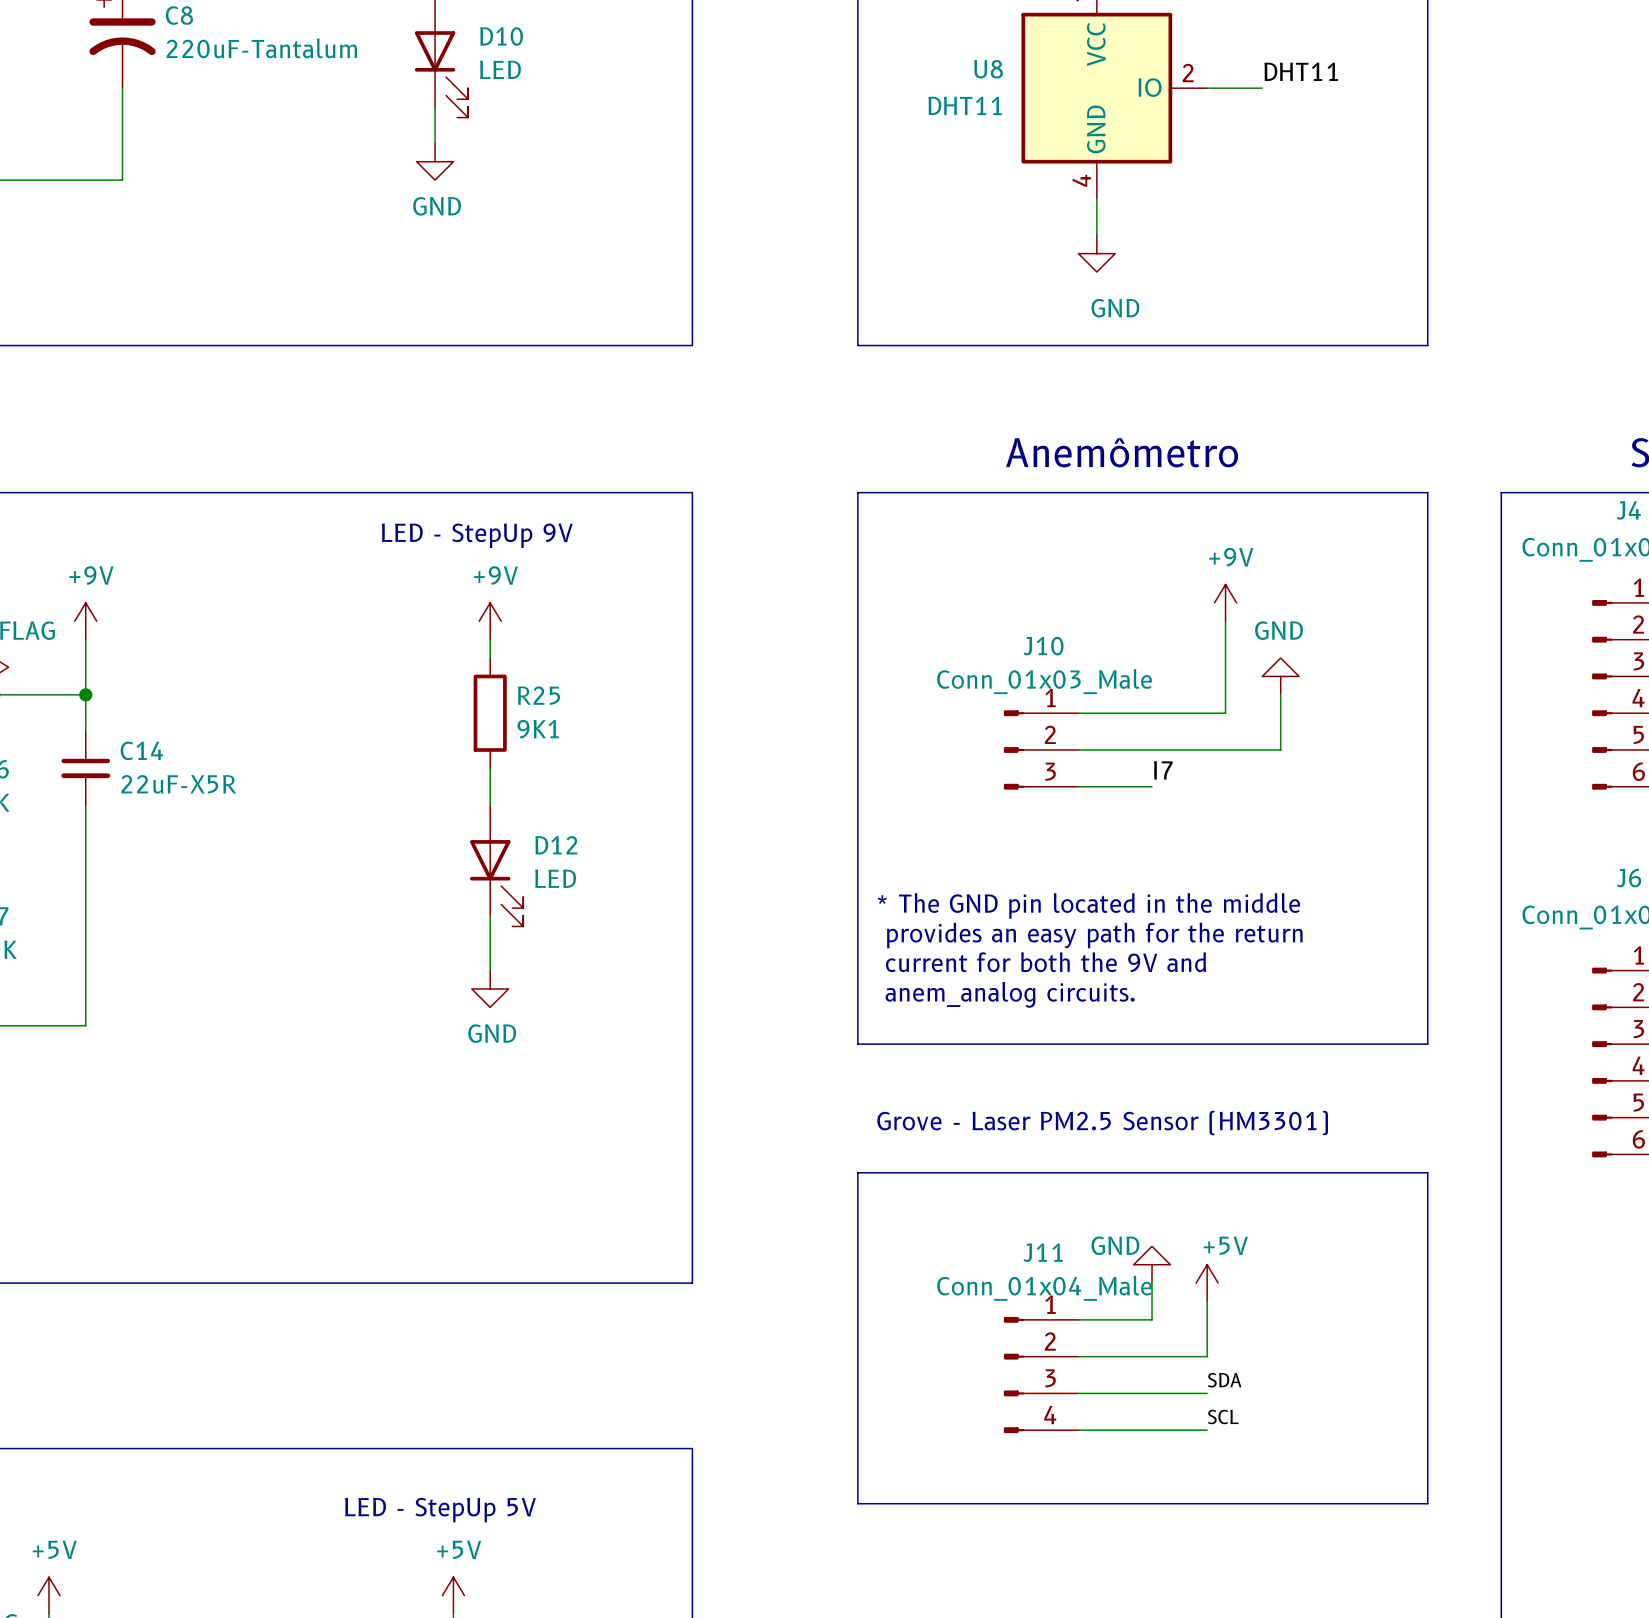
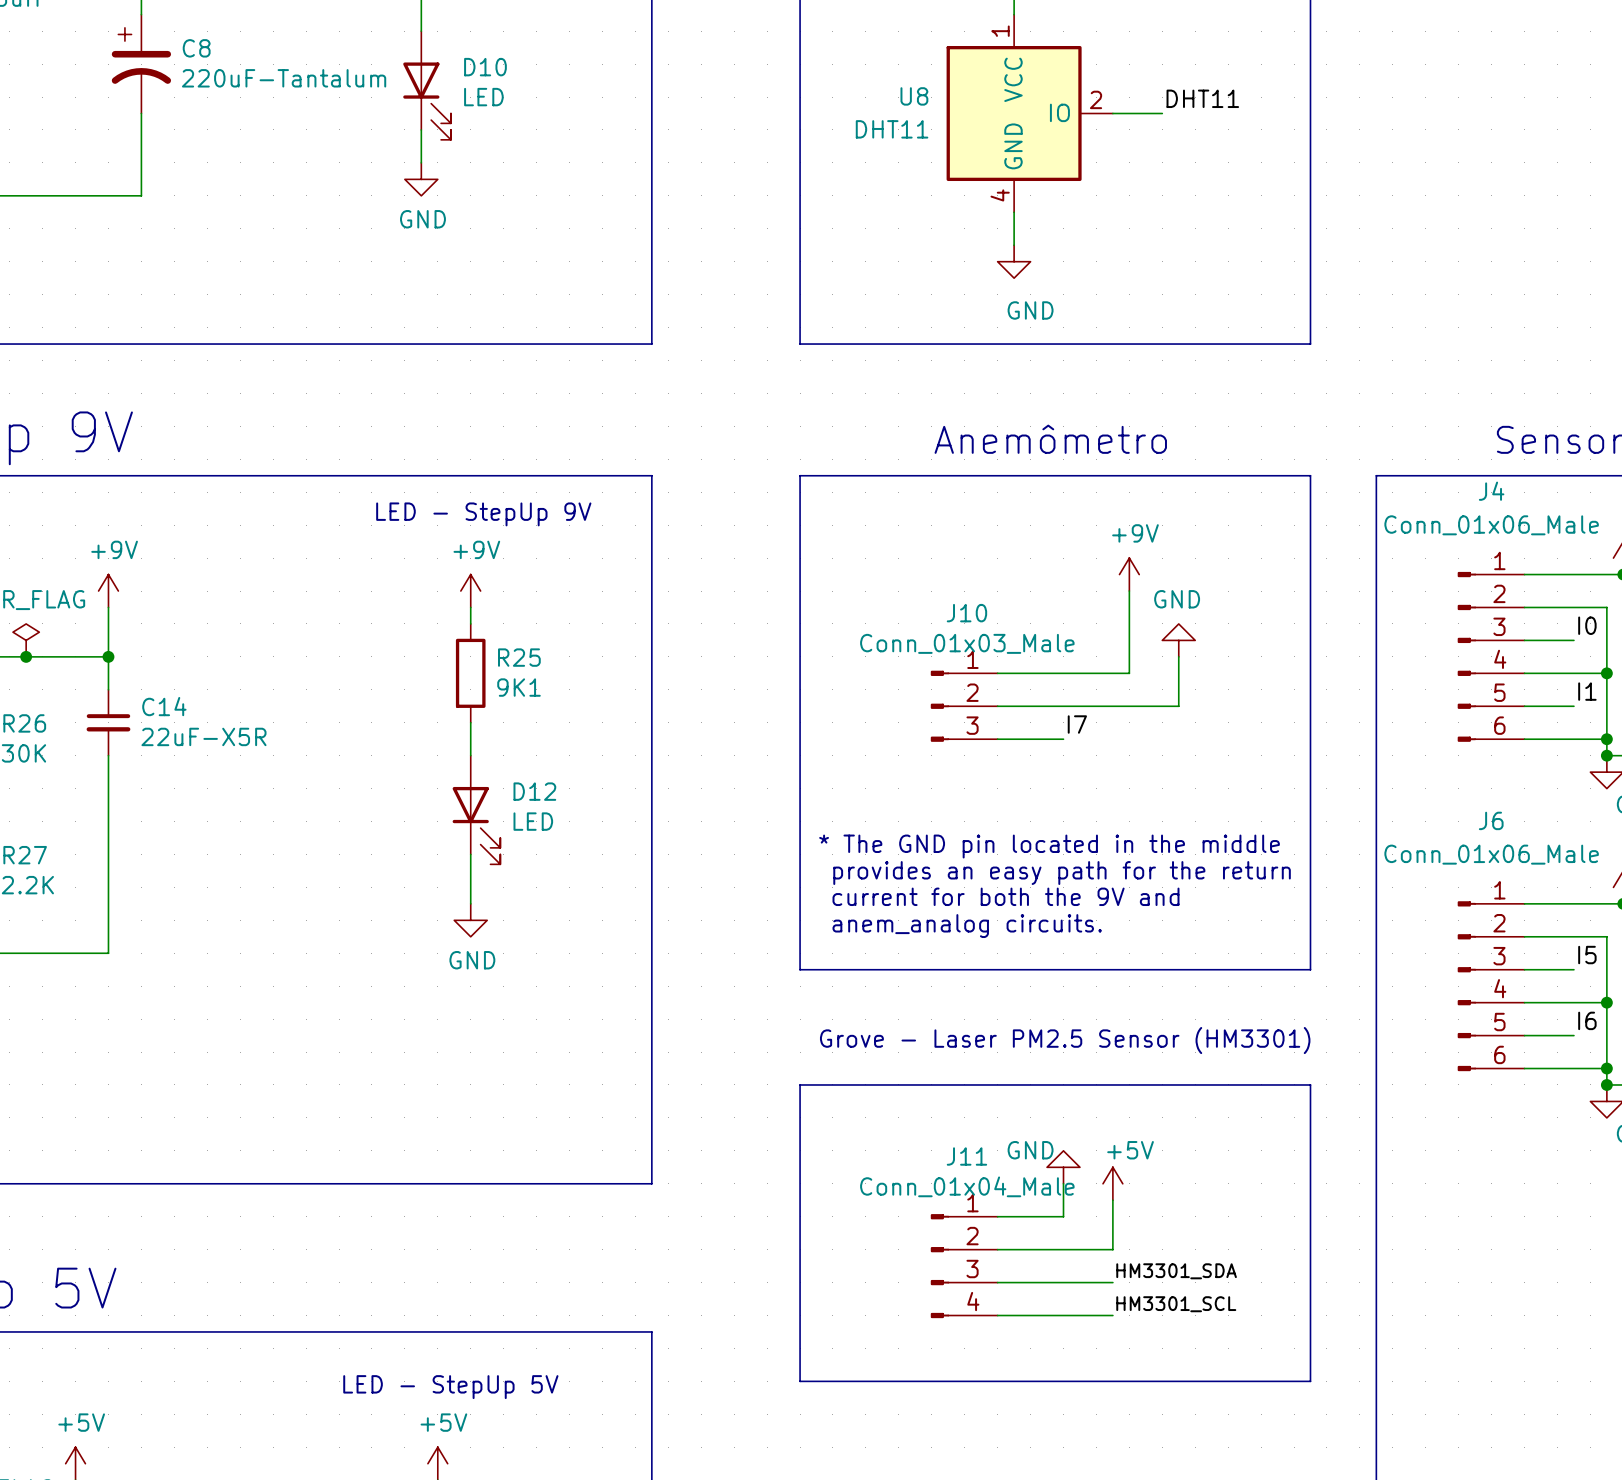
label: SDA (1224, 1380) -> HM3301_SDA (1176, 1271)
label: SCL (1223, 1416) -> HM3301_SCL (1176, 1304)

